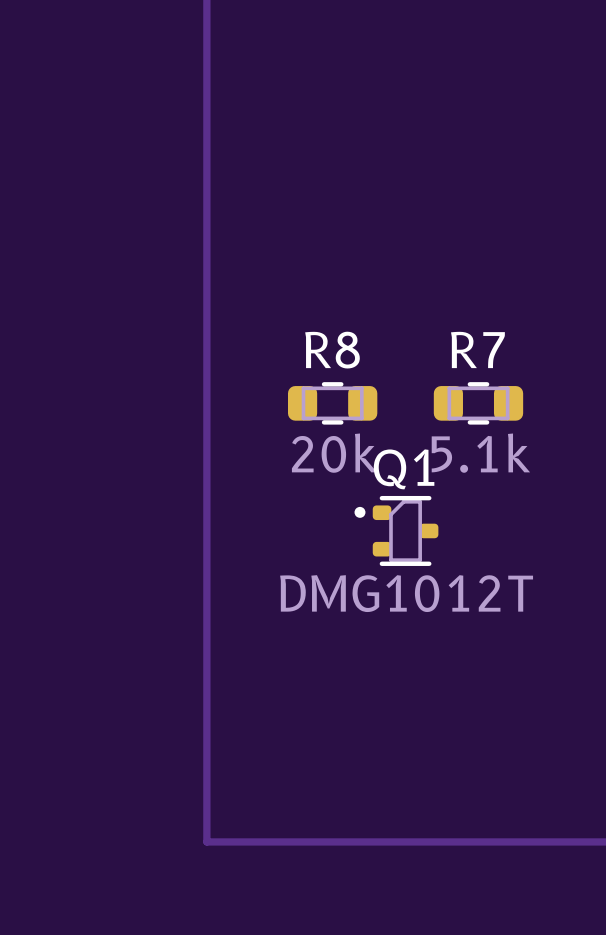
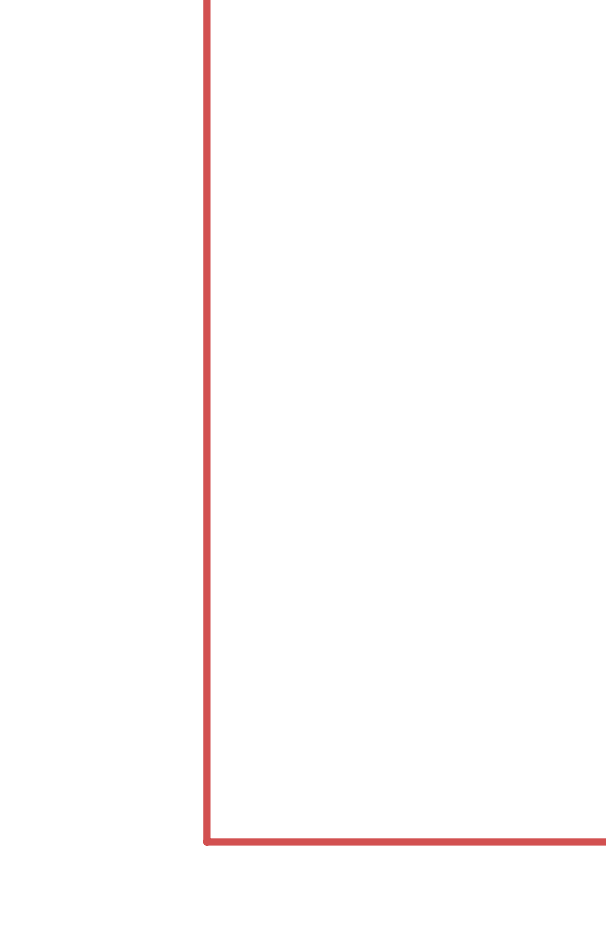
R8: 20k (332, 403) -> none
R7: 5.1k (478, 403) -> none
Q1: DMG1012T (396, 530) -> none

